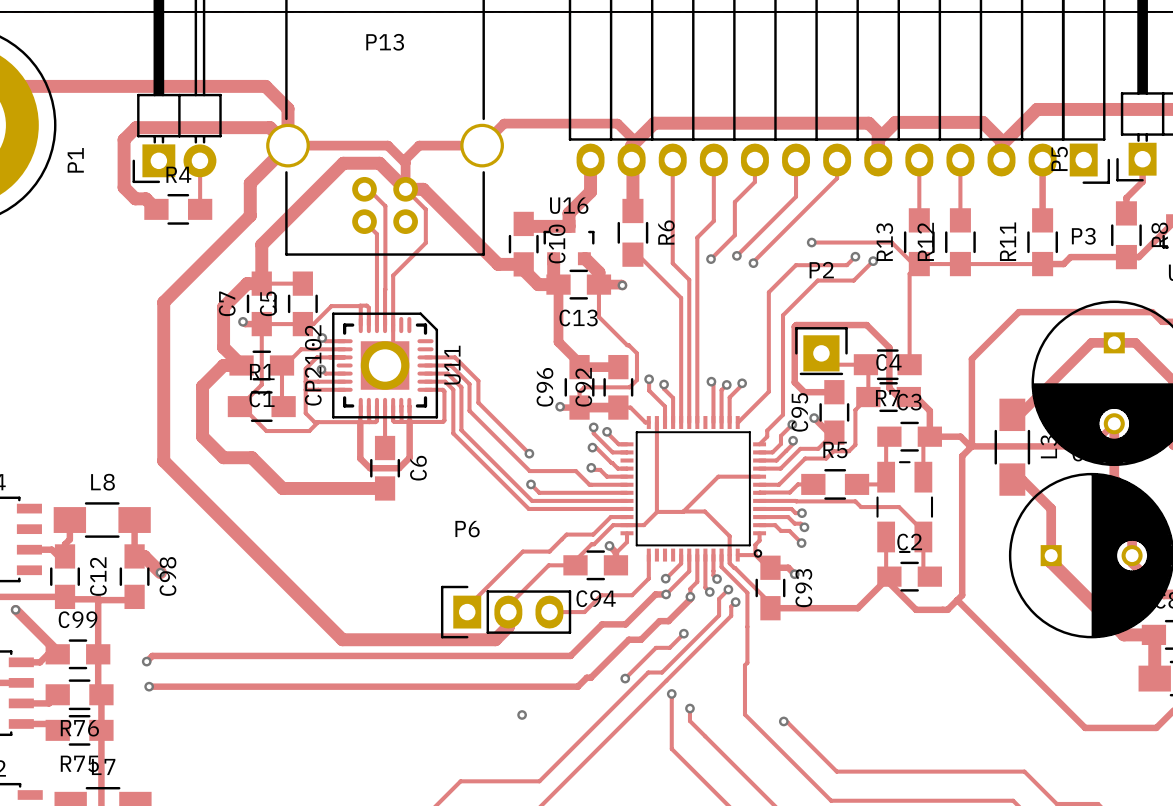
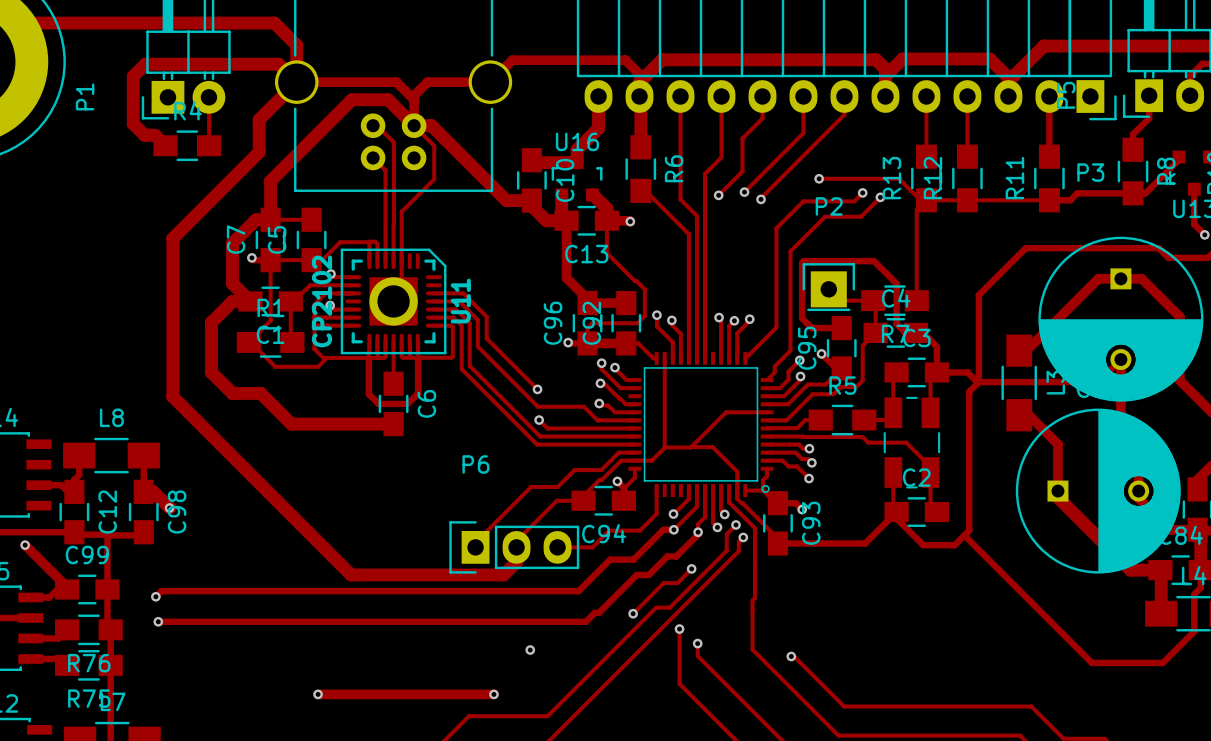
track: none -> (318, 694) (493, 694)
via: none -> (318, 694)
via: none -> (493, 694)

